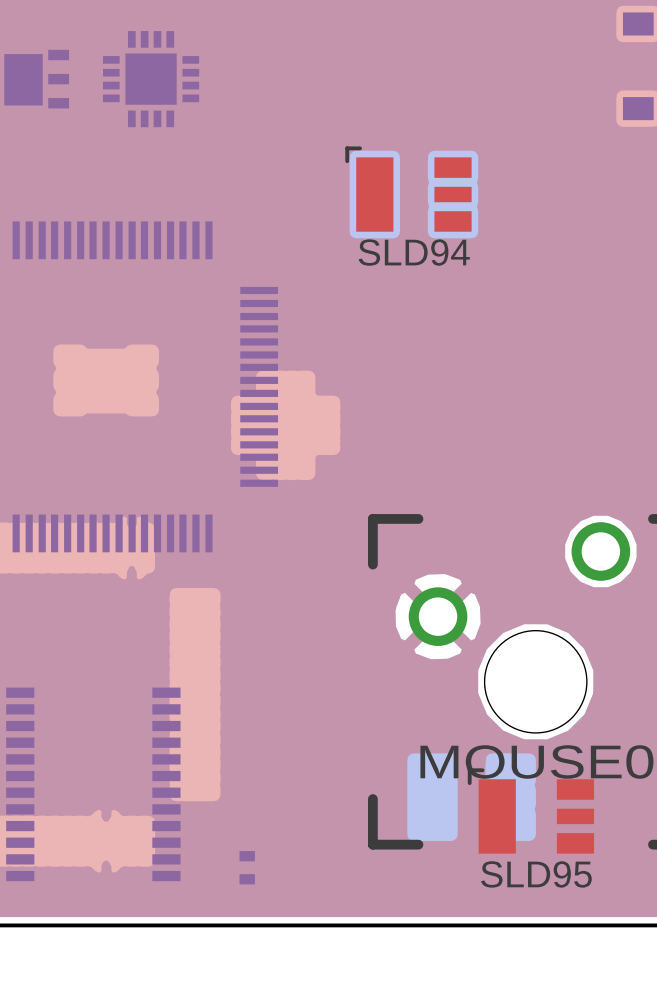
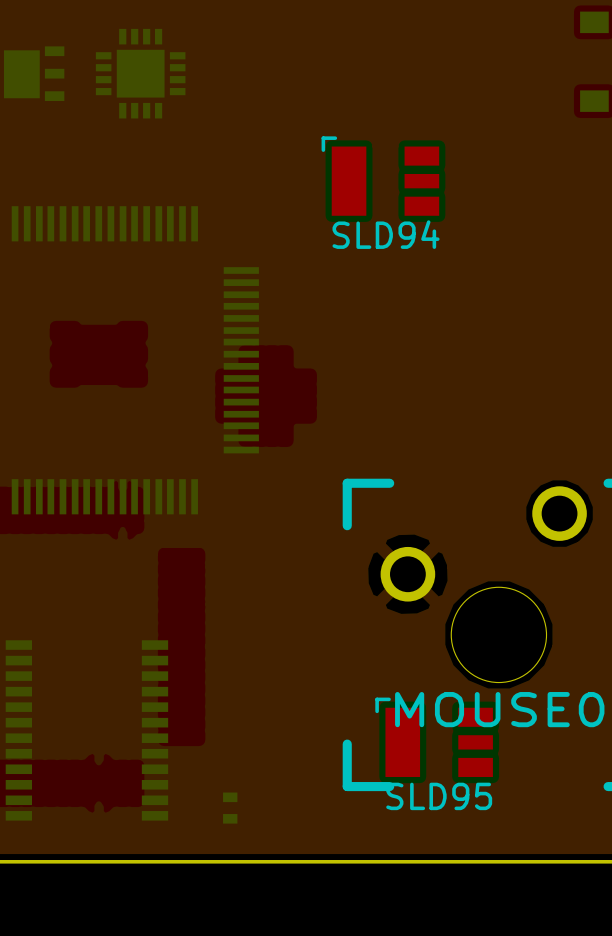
SLD95 position: (530, 810) -> (434, 737)

